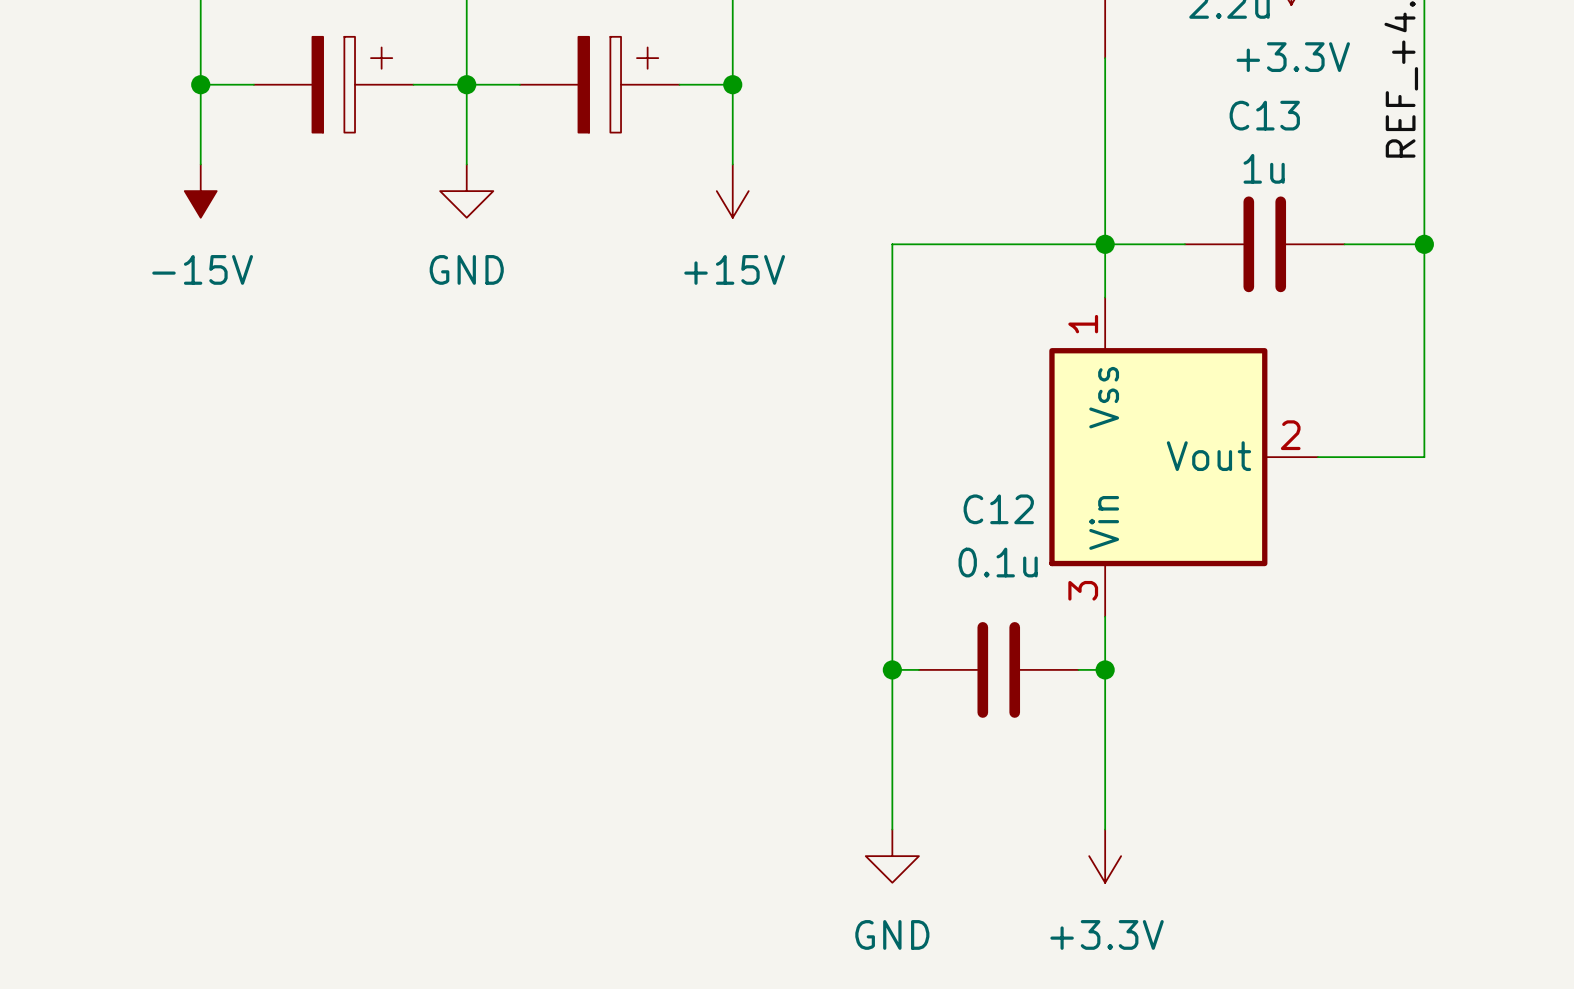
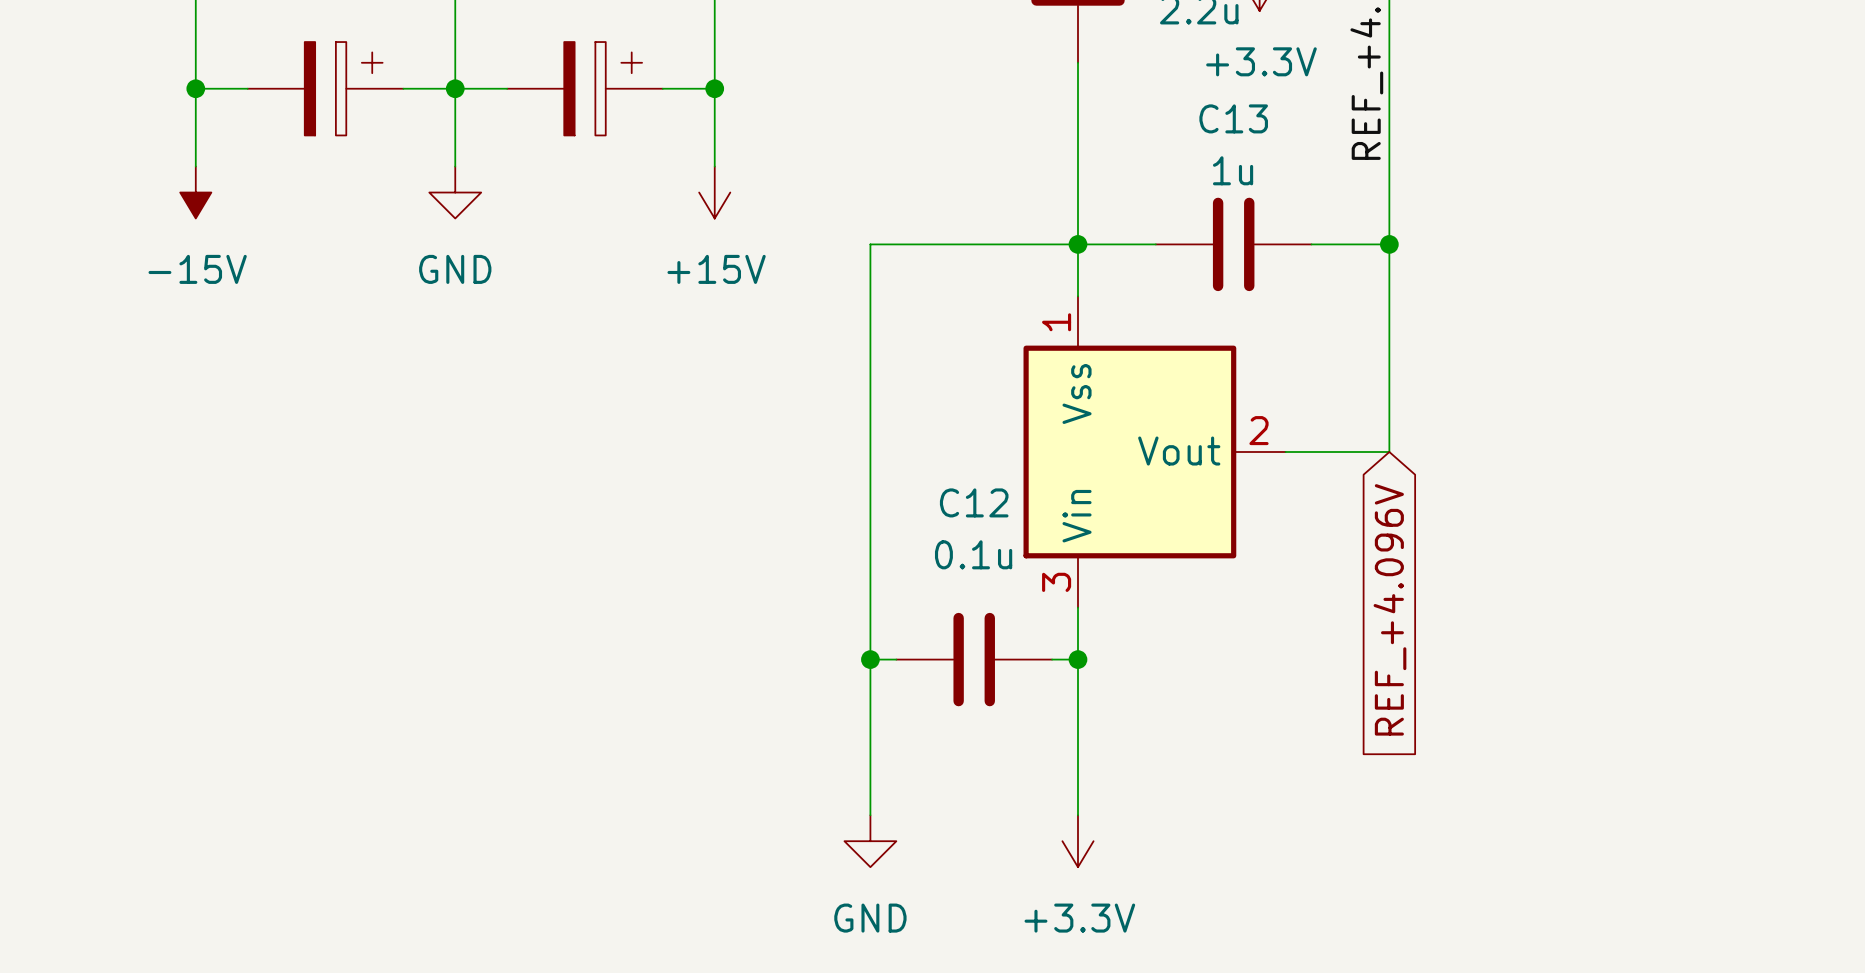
global label: none -> REF_+4.096V (1389, 609)

